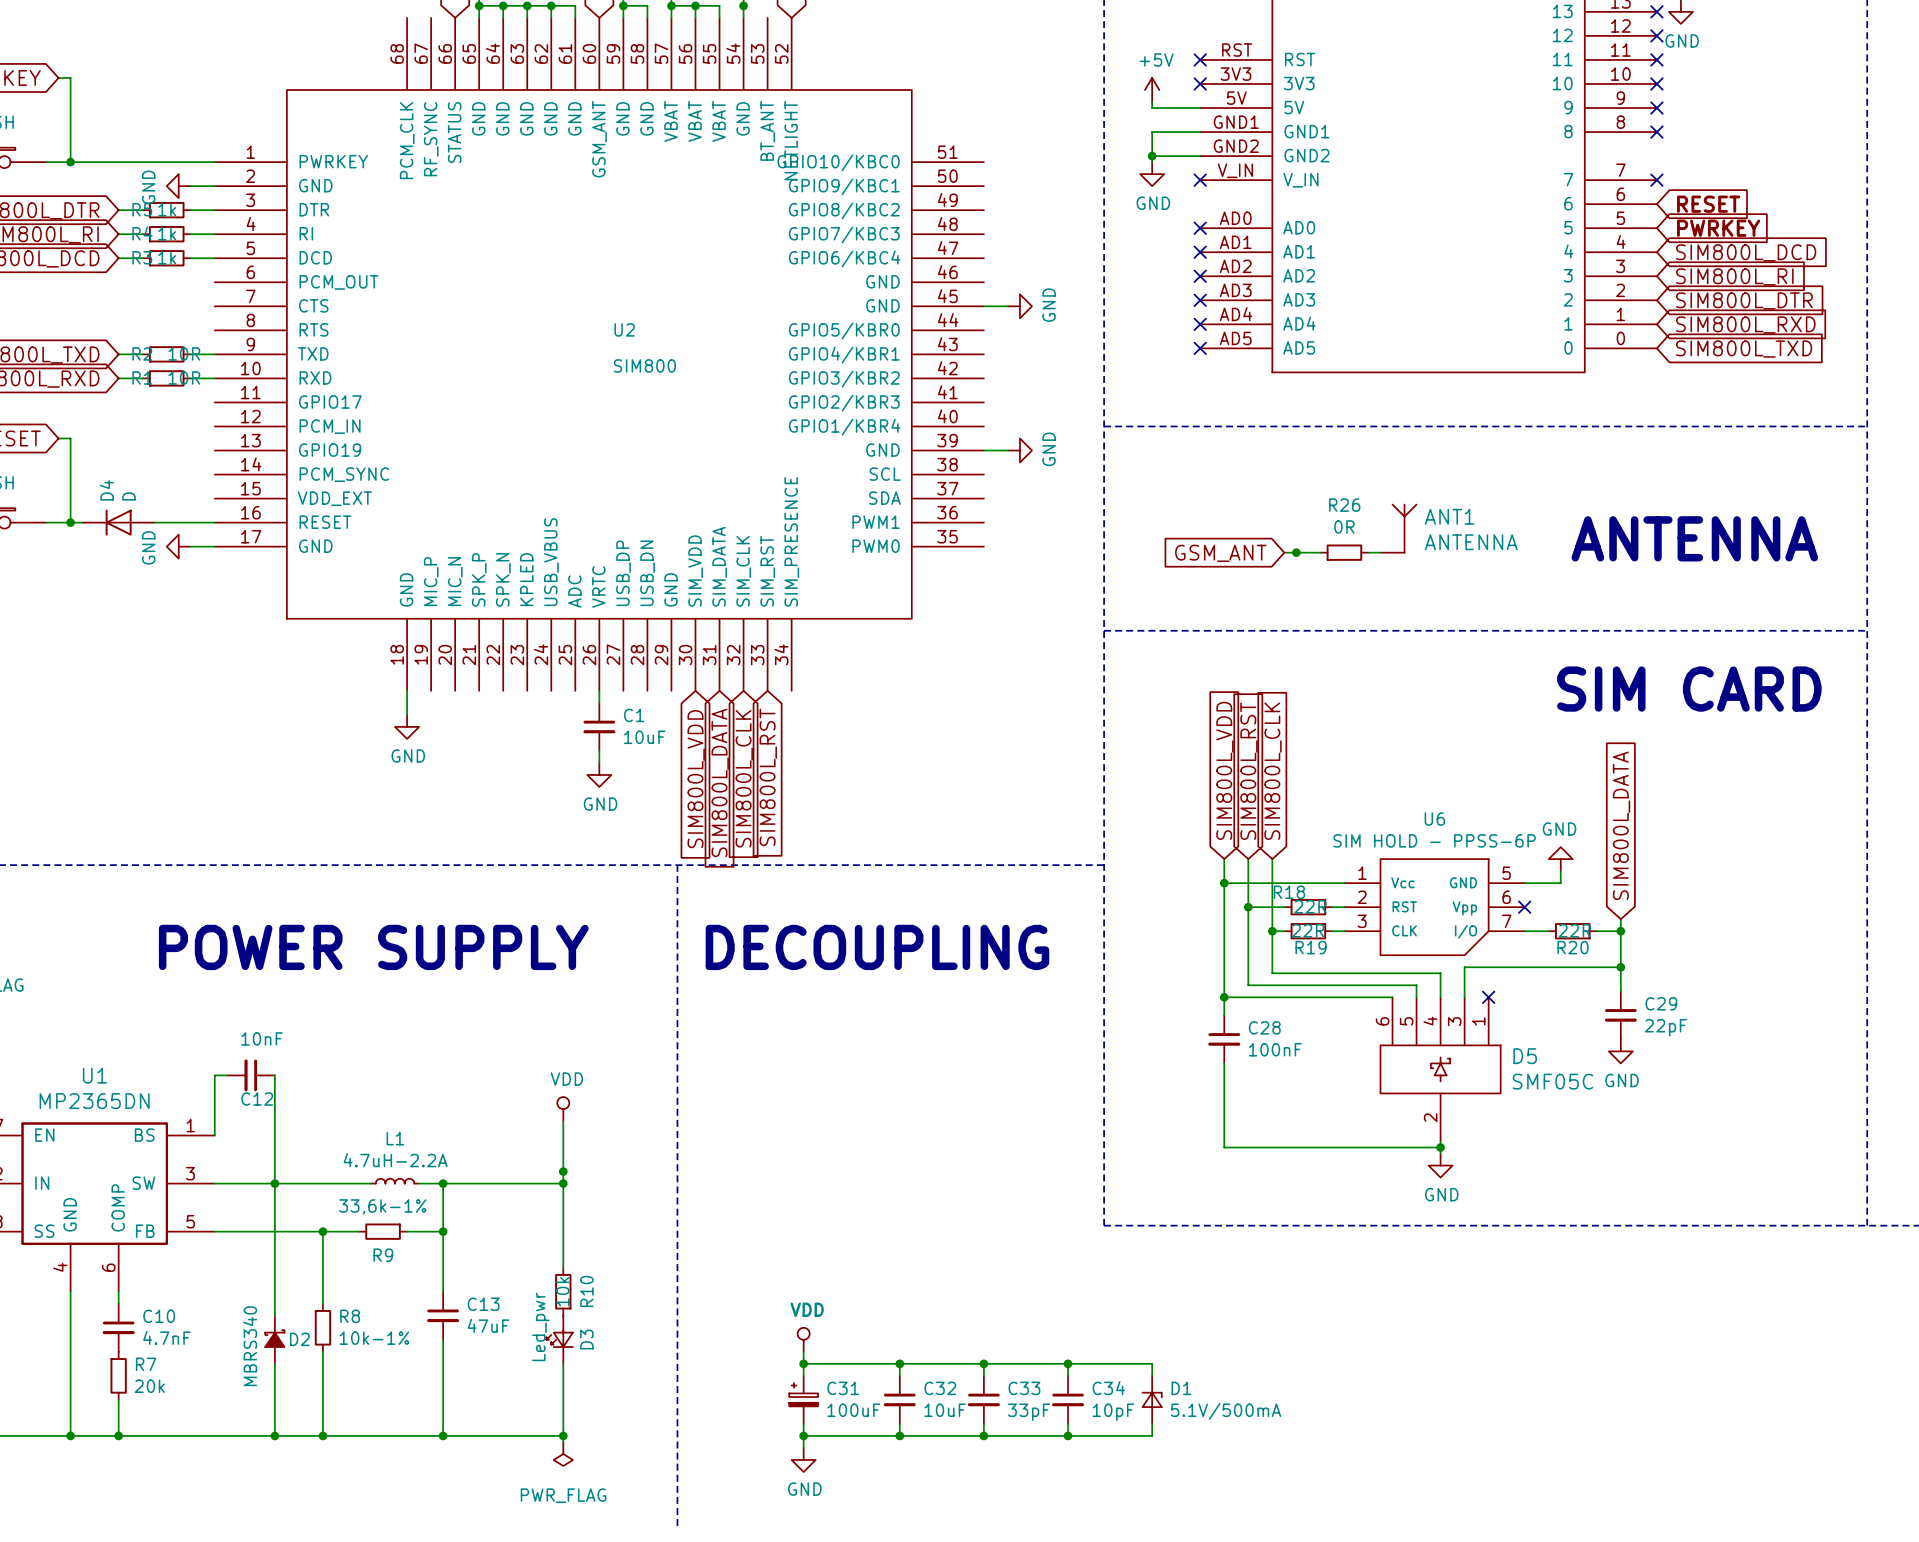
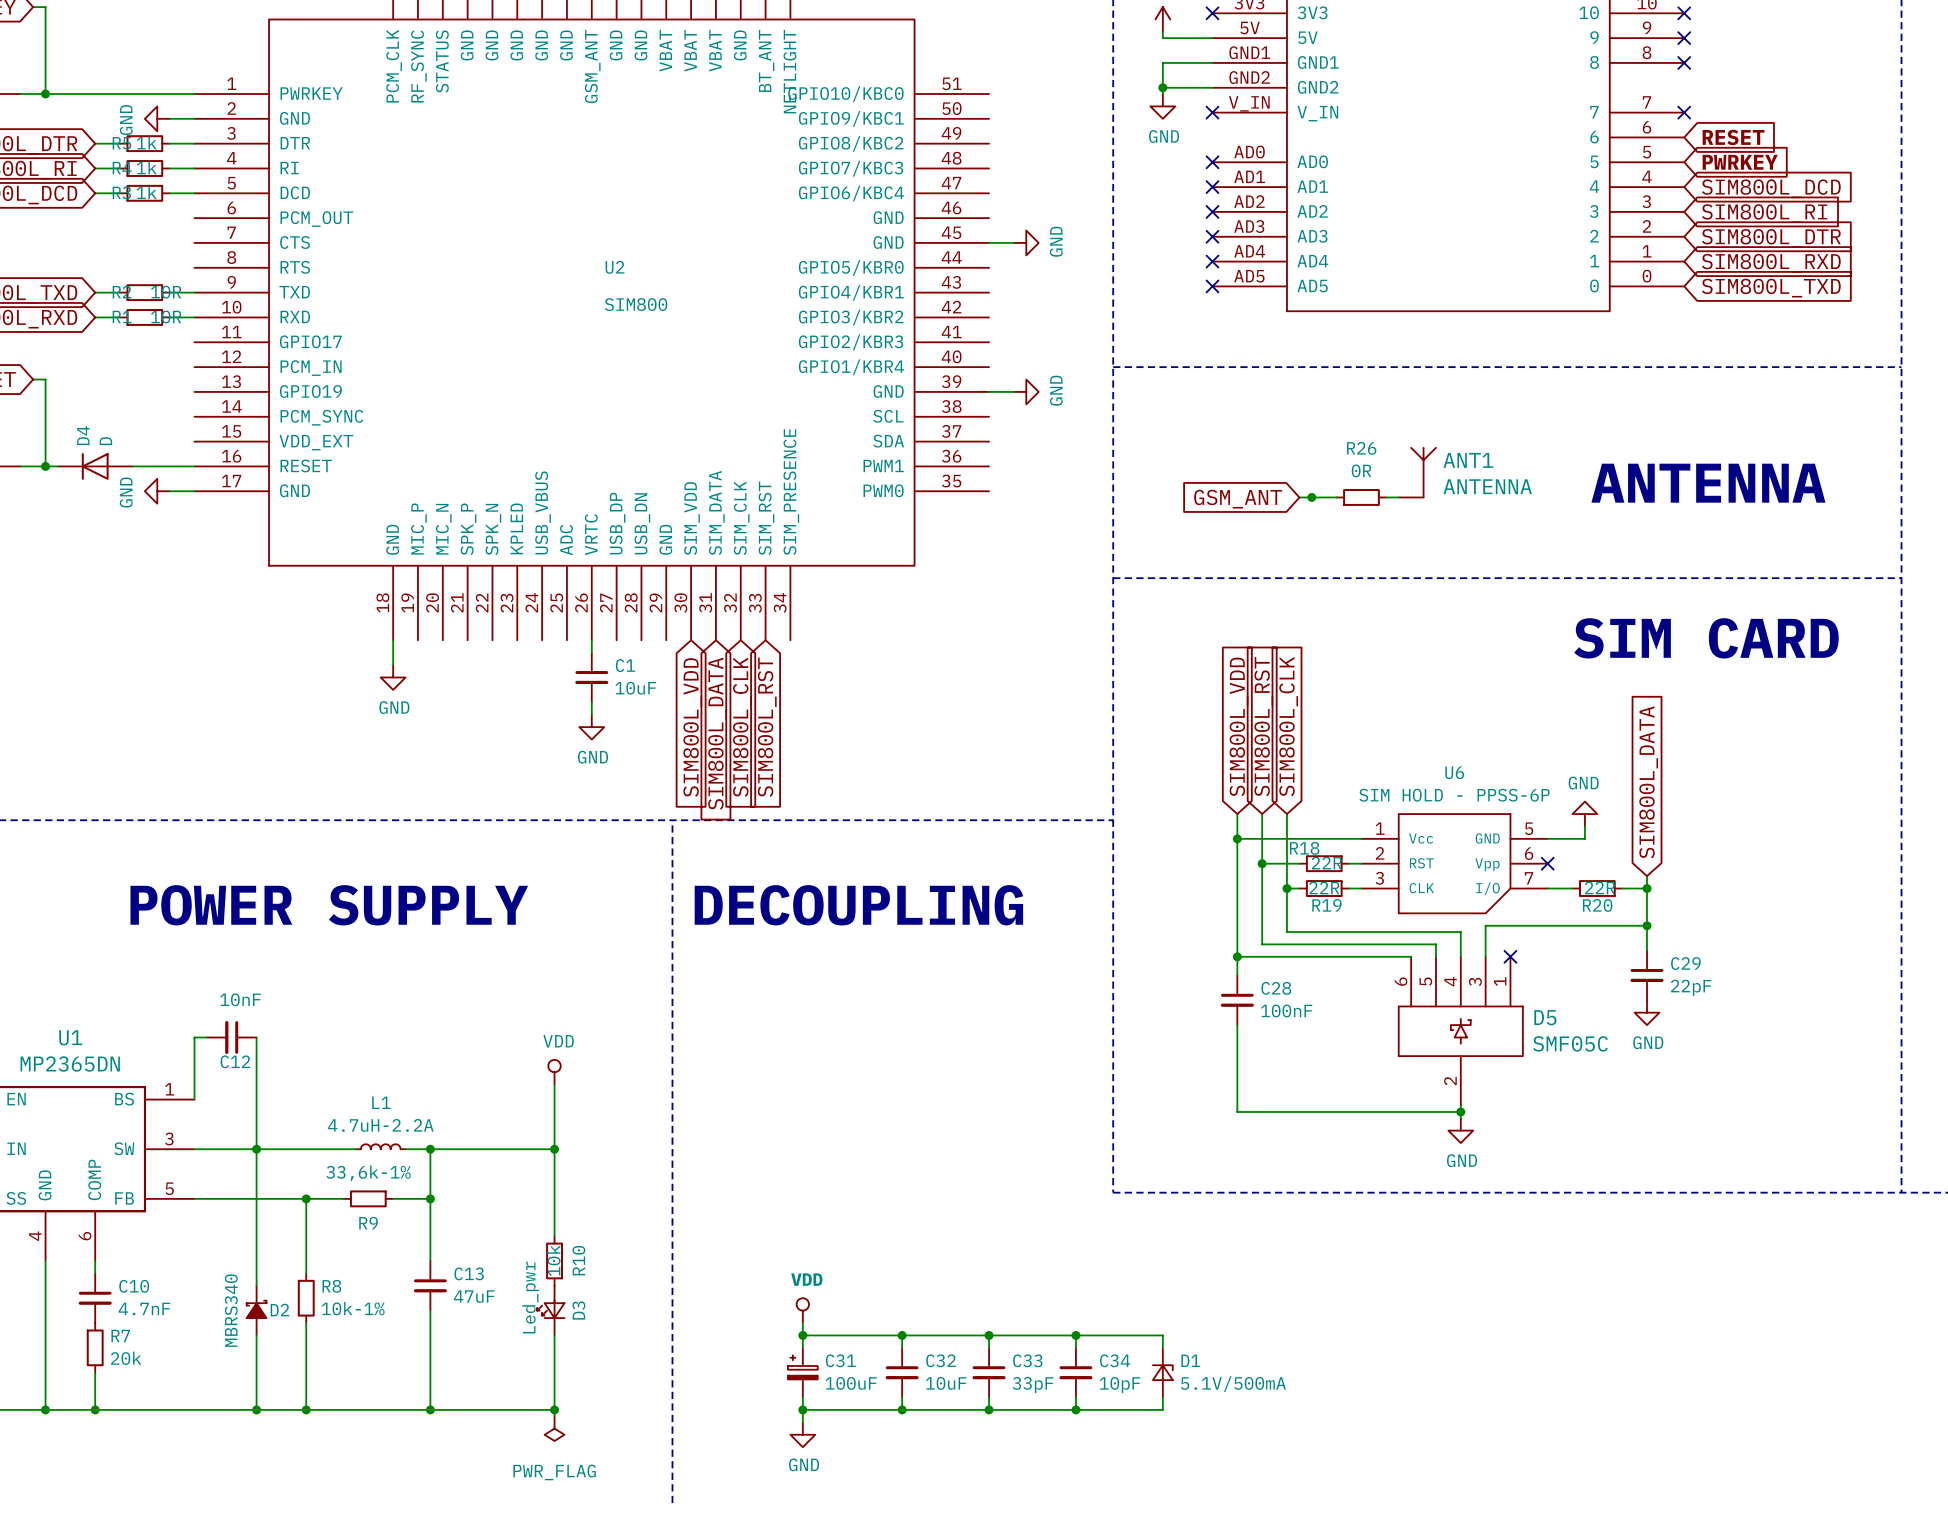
junction: (563, 1171) -> none

